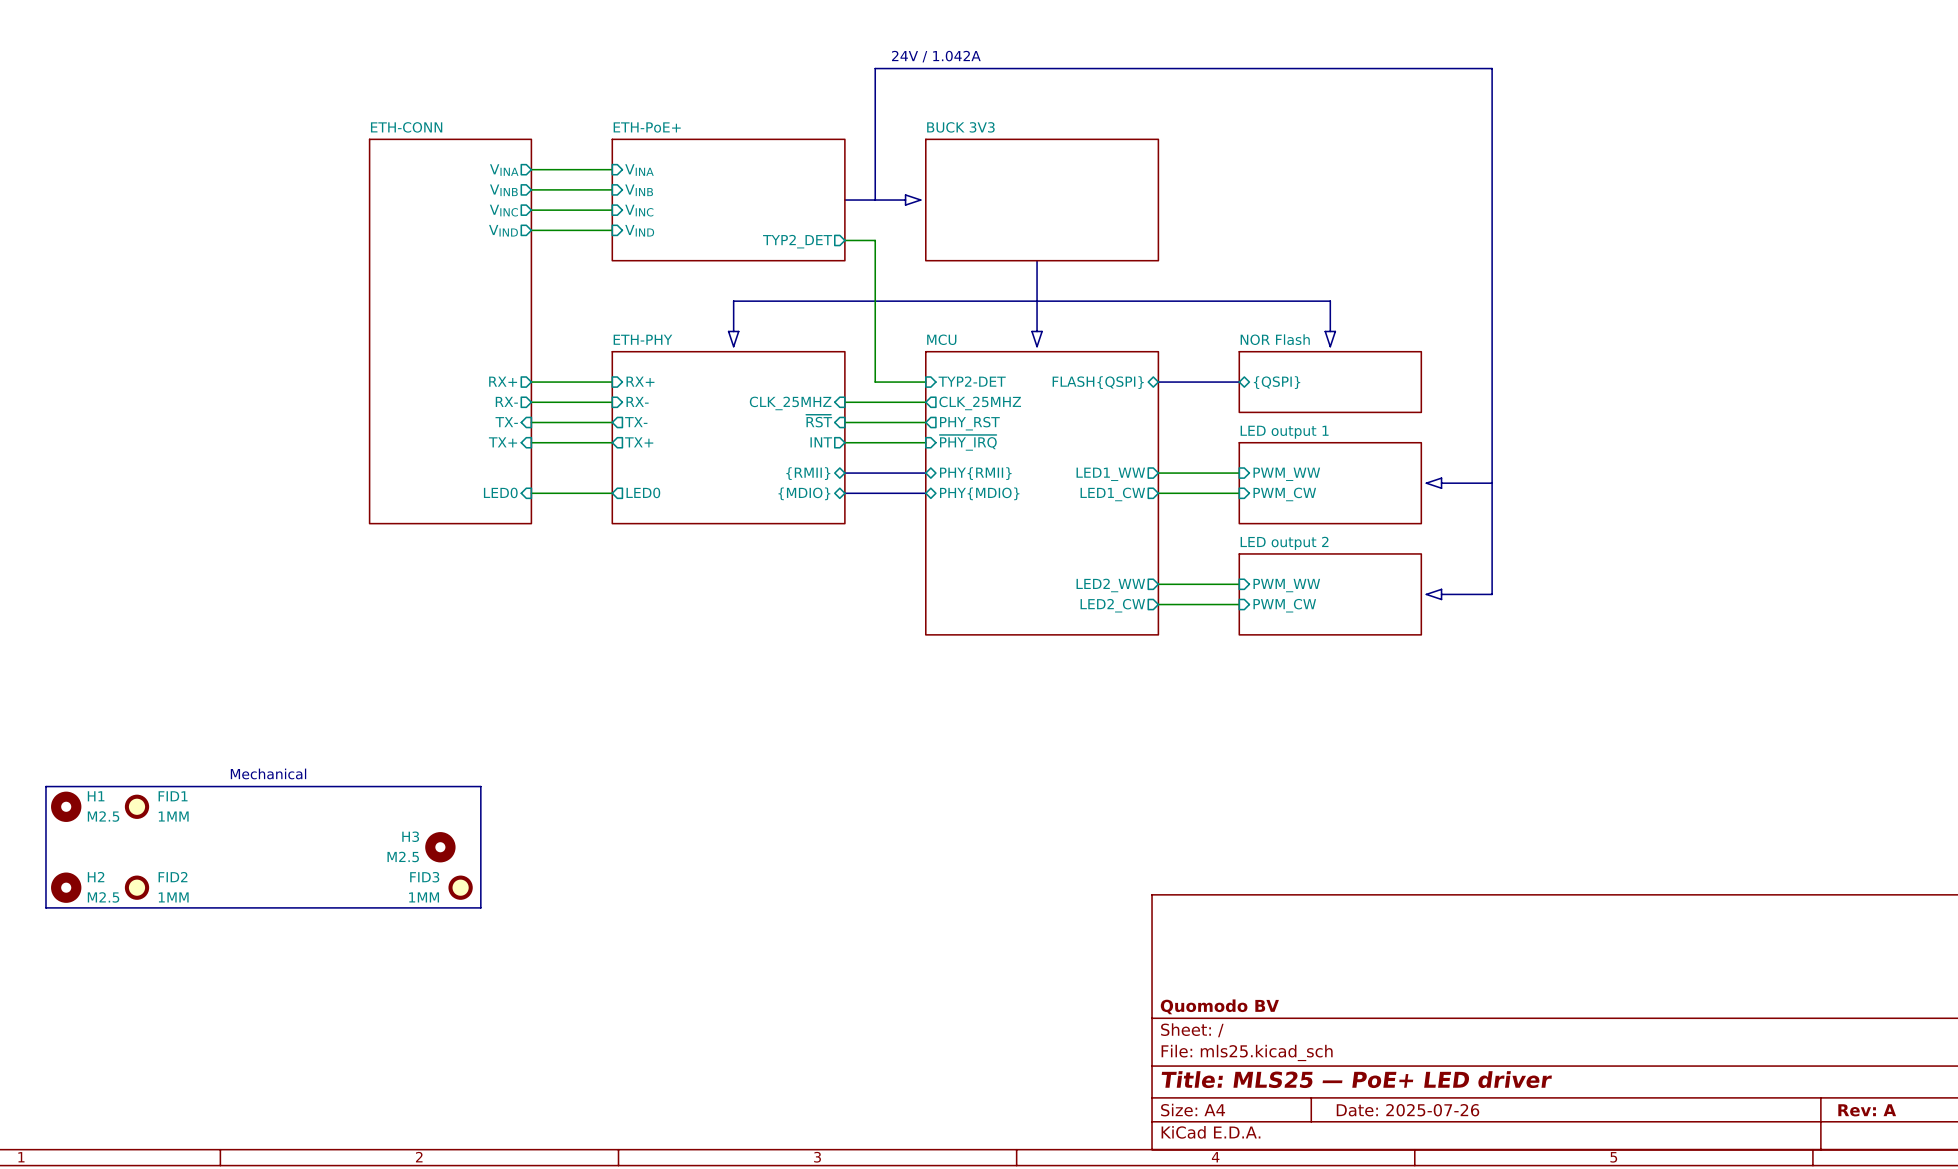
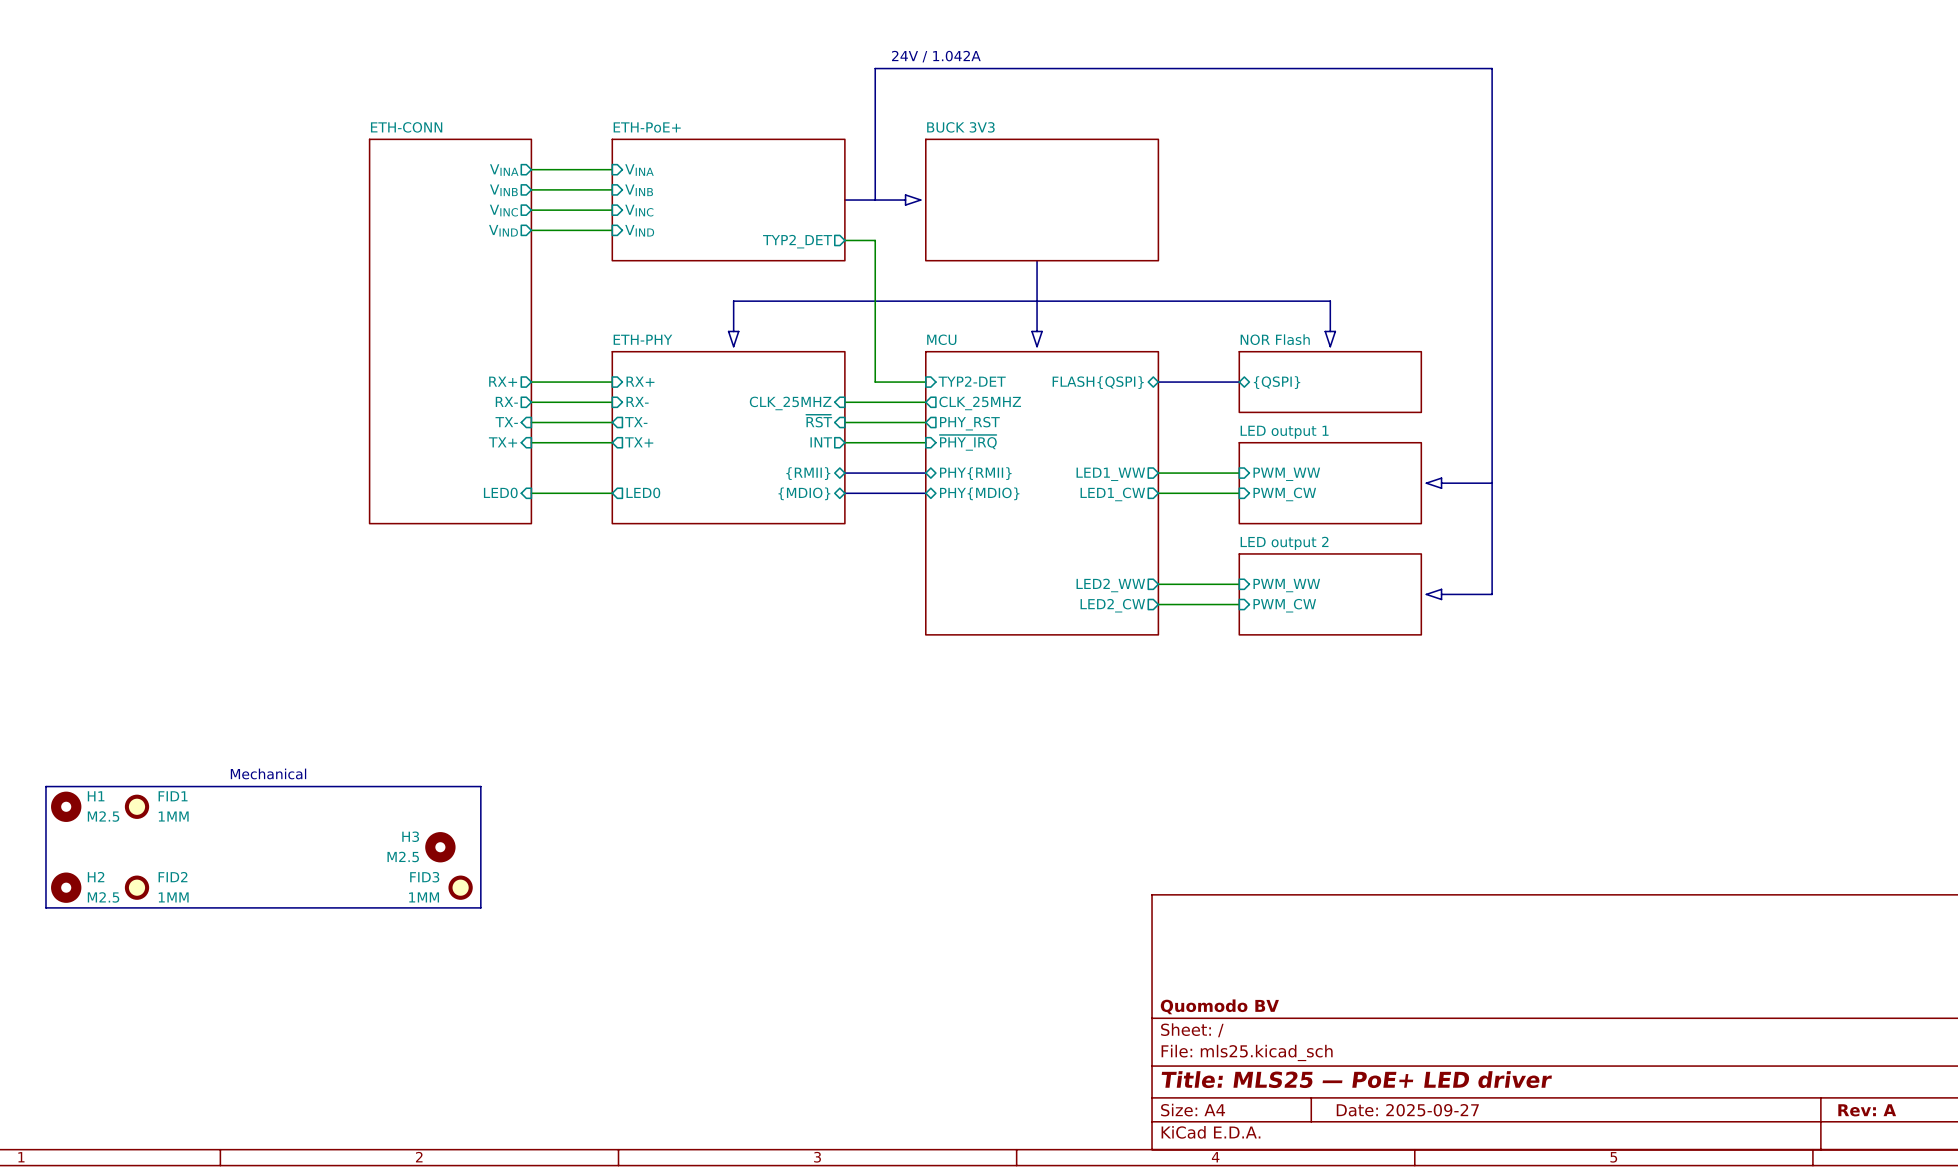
title block: Date: 2025-07-26 (1407, 1110) -> Date: 2025-09-27 (1407, 1110)

